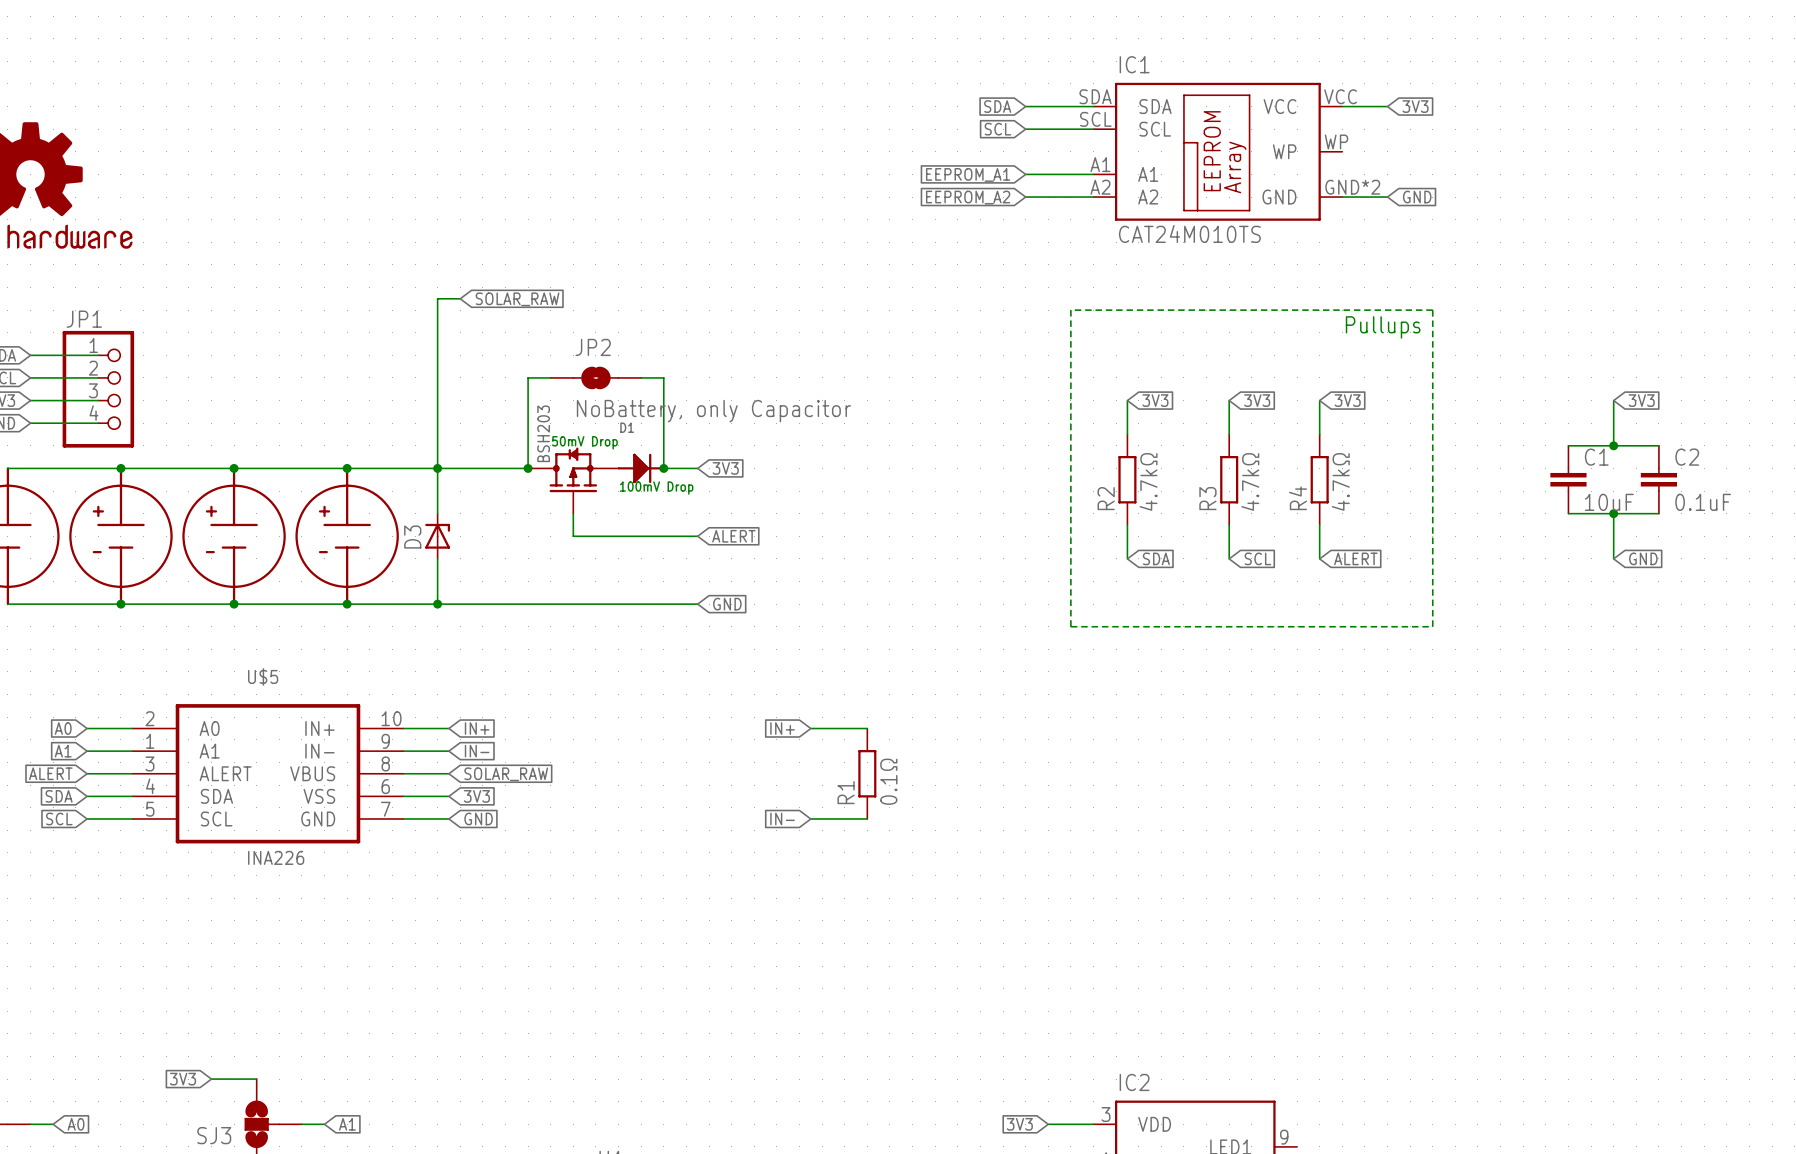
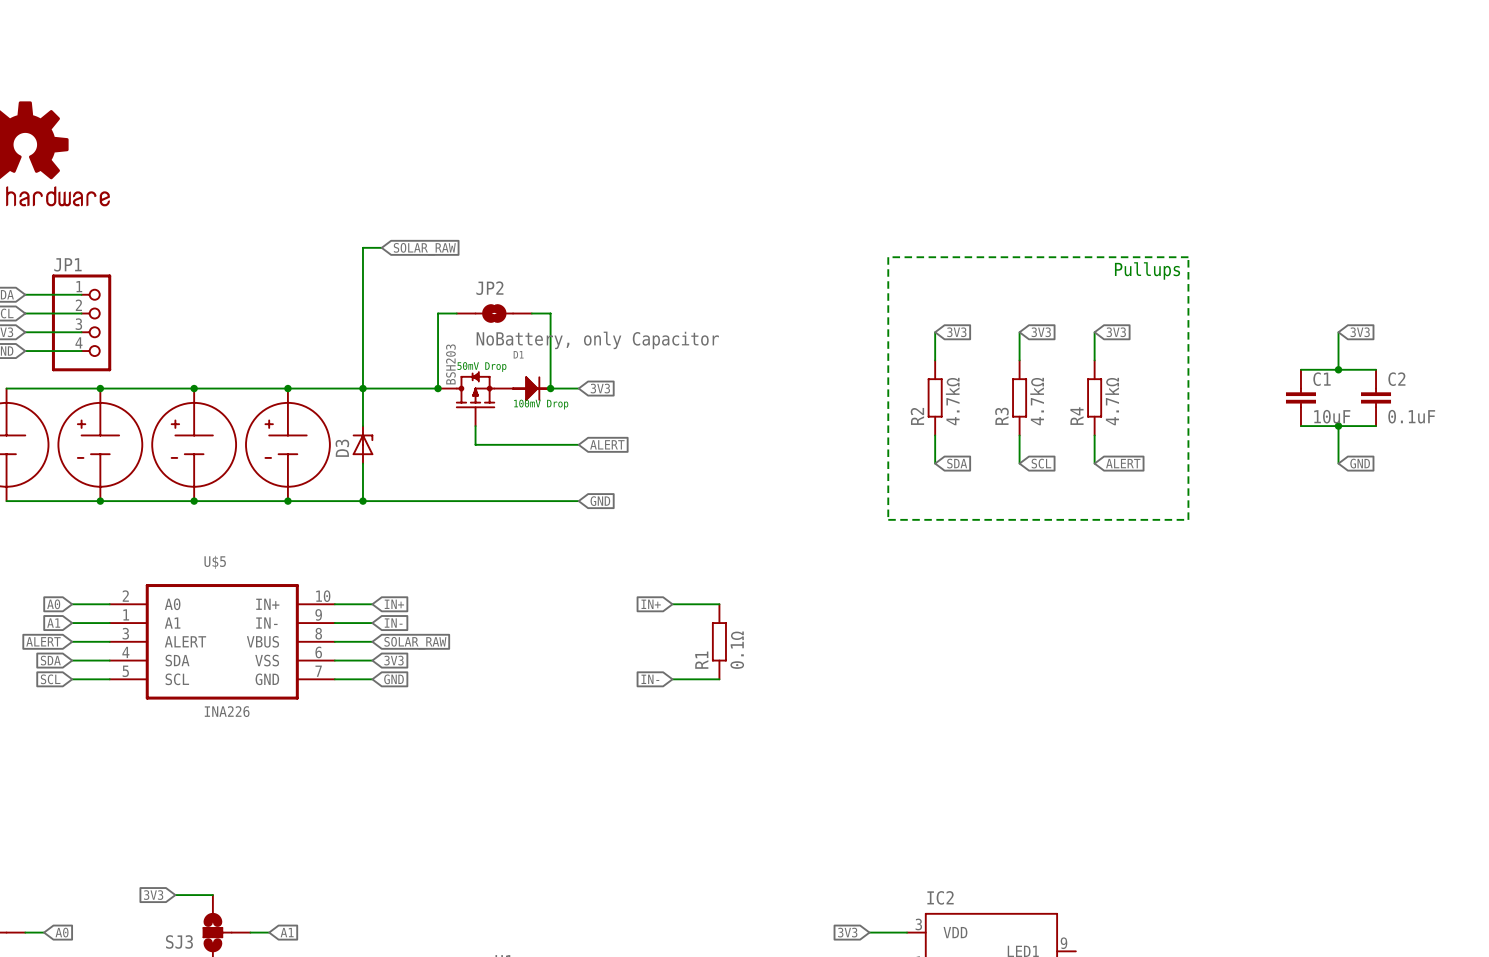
global label: SDA (997, 106) -> none
wire: (1025, 106) (1093, 106) -> none
wire: (1342, 106) (1387, 106) -> none
global label: 3V3 (1415, 106) -> none
global label: SCL (997, 129) -> none
wire: (1025, 129) (1093, 129) -> none
IC1: CAT24M010TS (1217, 151) -> none
global label: EEPROM_A1 (968, 174) -> none
wire: (1025, 174) (1093, 174) -> none
global label: EEPROM_A2 (968, 197) -> none
wire: (1025, 197) (1093, 197) -> none
wire: (1342, 197) (1387, 197) -> none
global label: GND (1417, 197) -> none

